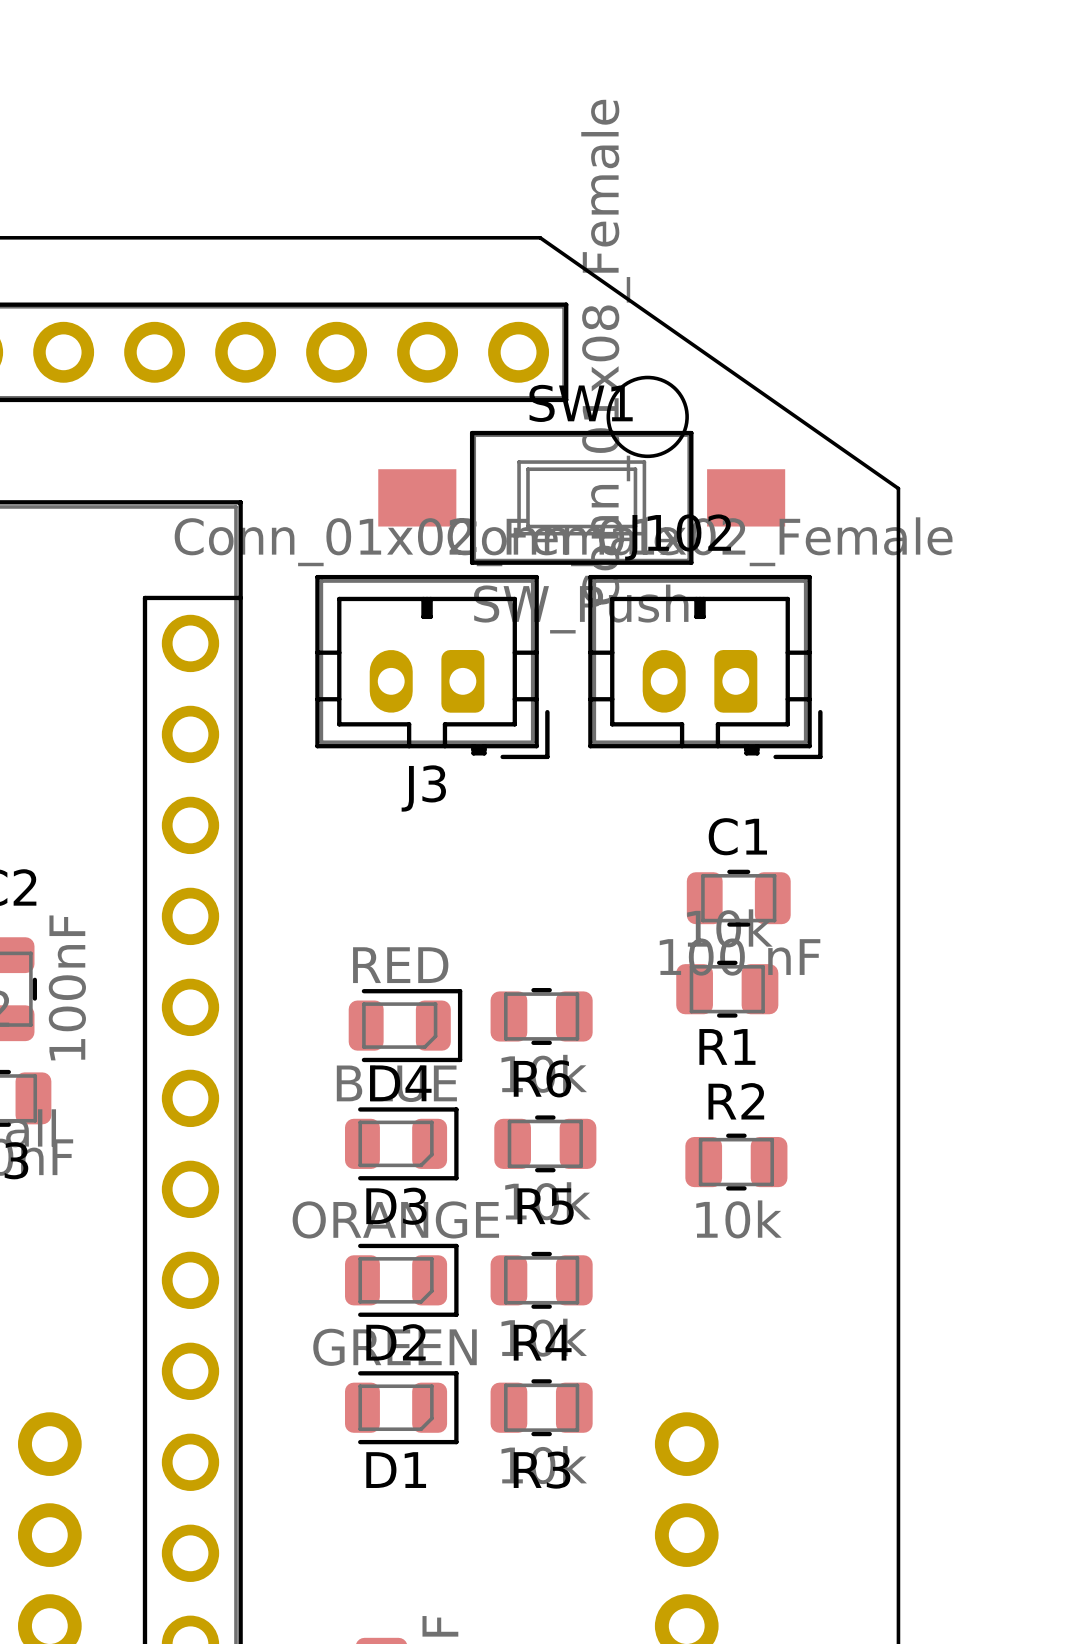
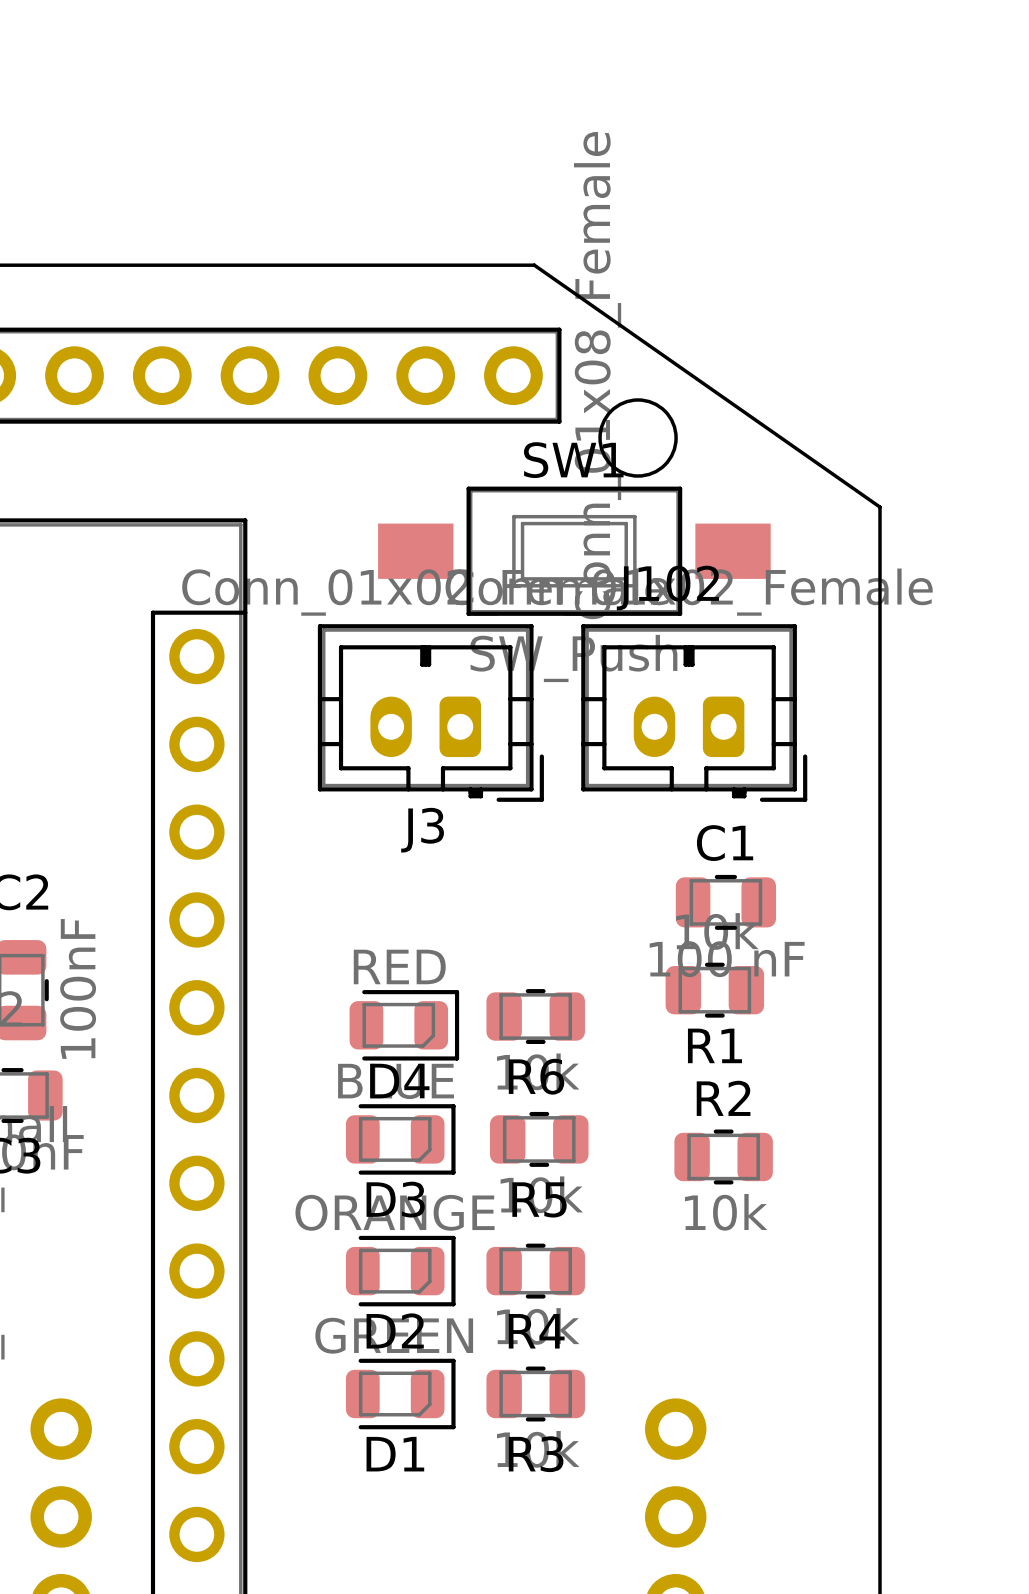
SW1 position: (581, 497) -> (574, 551)
J3 position: (432, 667) -> (430, 712)
J102 position: (705, 667) -> (694, 712)

